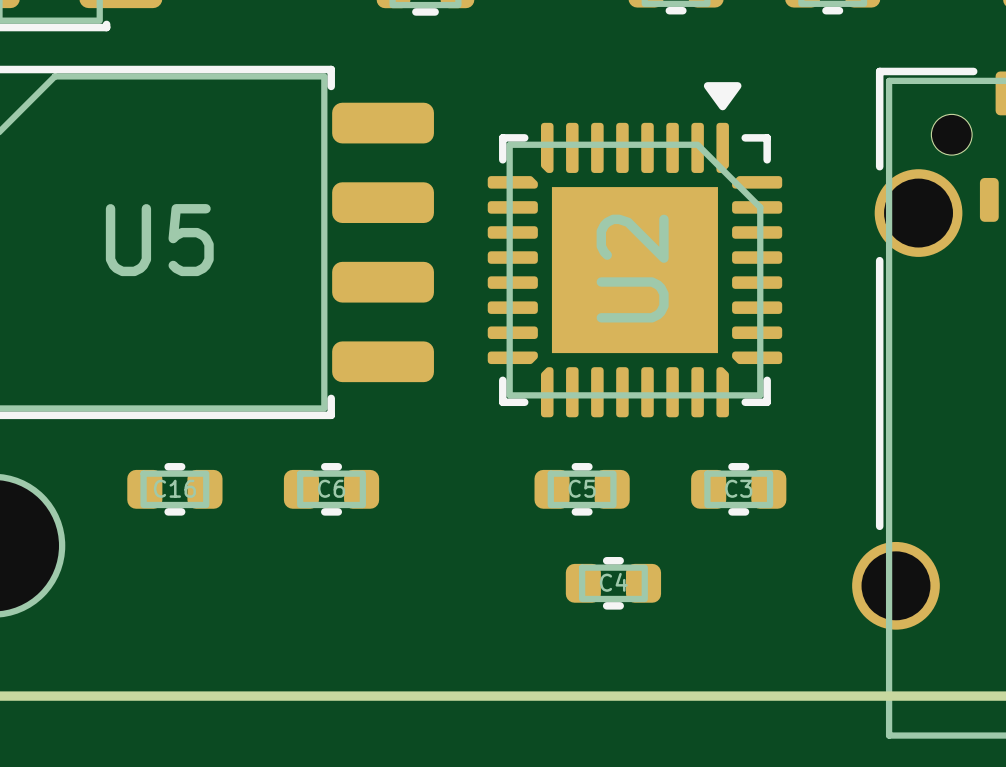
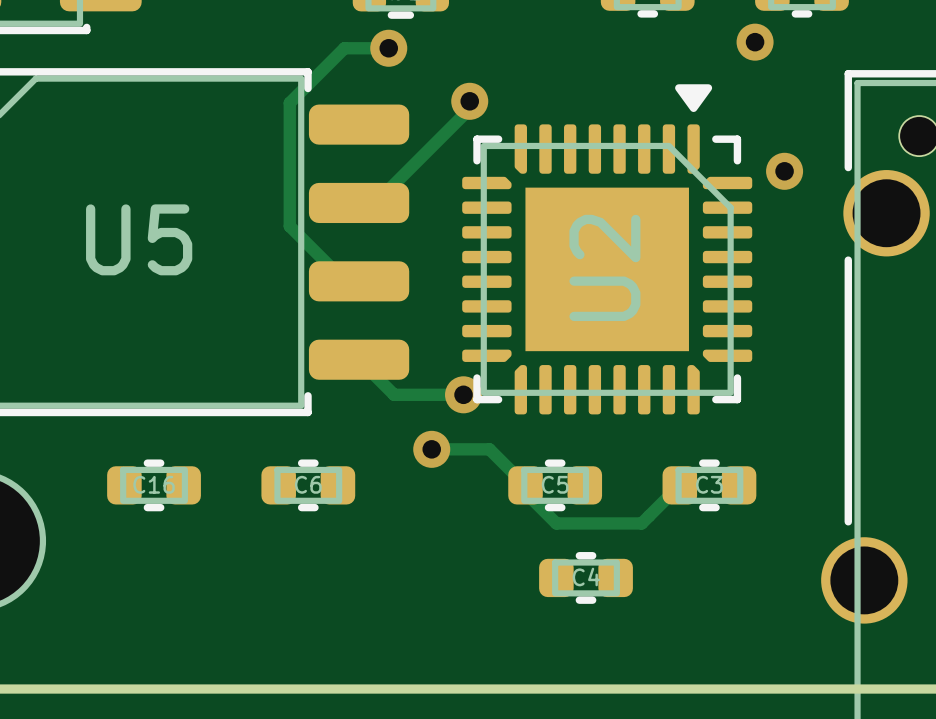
via: none -> (755, 42)
track: none -> (388, 48) (344, 48) (289, 102) (289, 226) (344, 281) (359, 281)
via: none -> (388, 48)
track: none -> (469, 101) (469, 108) (375, 202) (359, 202)
via: none -> (469, 101)
via: none -> (784, 171)
track: none -> (359, 359) (394, 394) (463, 394)
via: none -> (463, 394)
track: none -> (431, 449) (489, 449) (525, 485) (525, 492) (556, 523) (641, 523) (679, 485)
via: none -> (431, 449)

